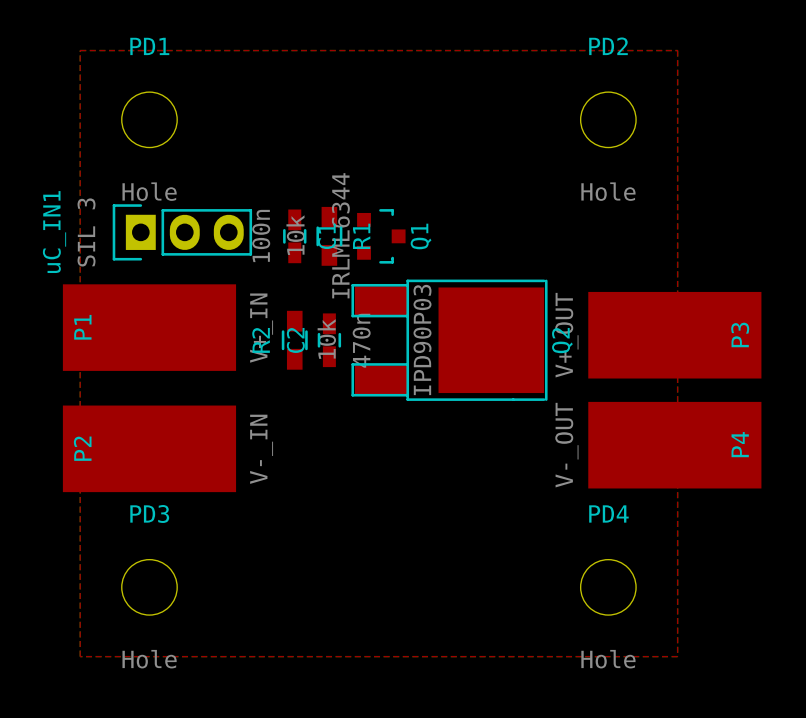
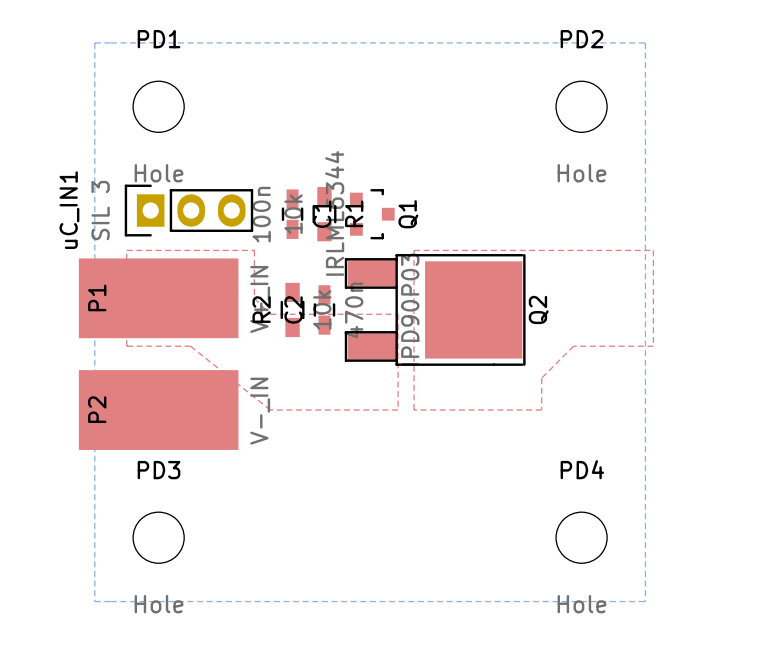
top zone outline: (80, 50) (80, 656) (677, 656) (677, 50) (80, 50) -> none
top zone outline: none -> (126, 250) (126, 346) (190, 346) (270, 410) (398, 410) (398, 314) (270, 314) (254, 298) (254, 250) (126, 250)
top zone outline: none -> (414, 250) (653, 250) (653, 346) (573, 346) (541, 378) (541, 410) (414, 410) (414, 250)
P3: V+_OUT (674, 335) -> none
P4: V-_OUT (674, 445) -> none

